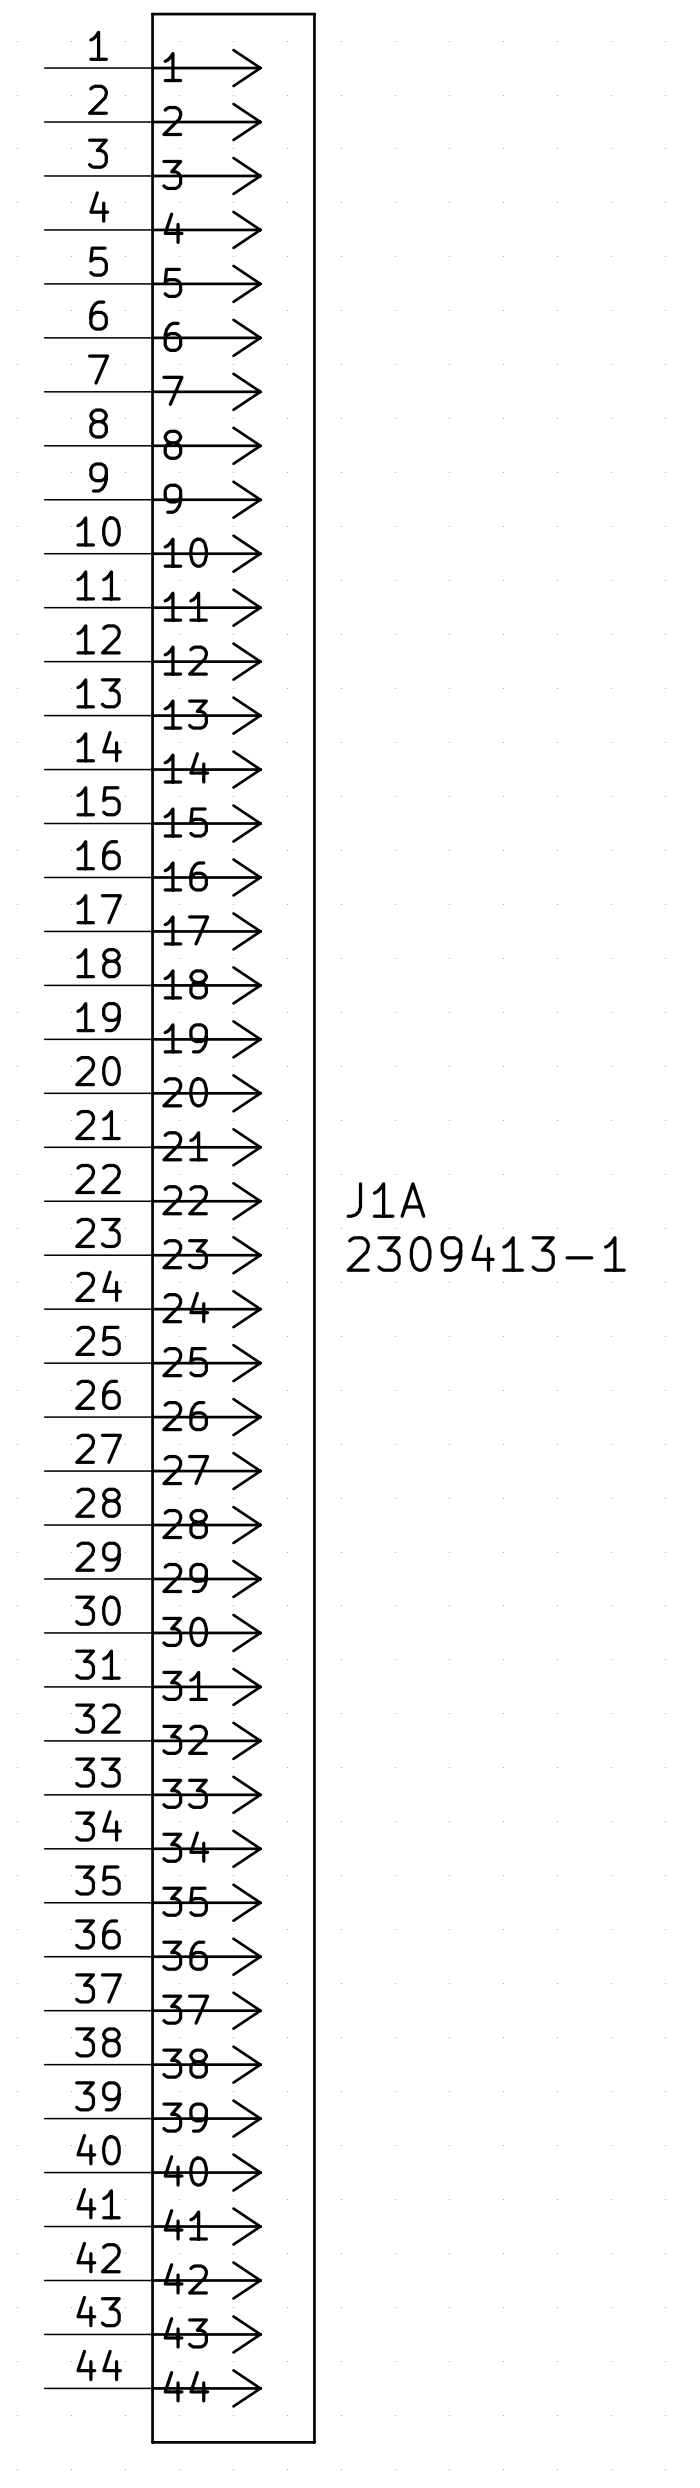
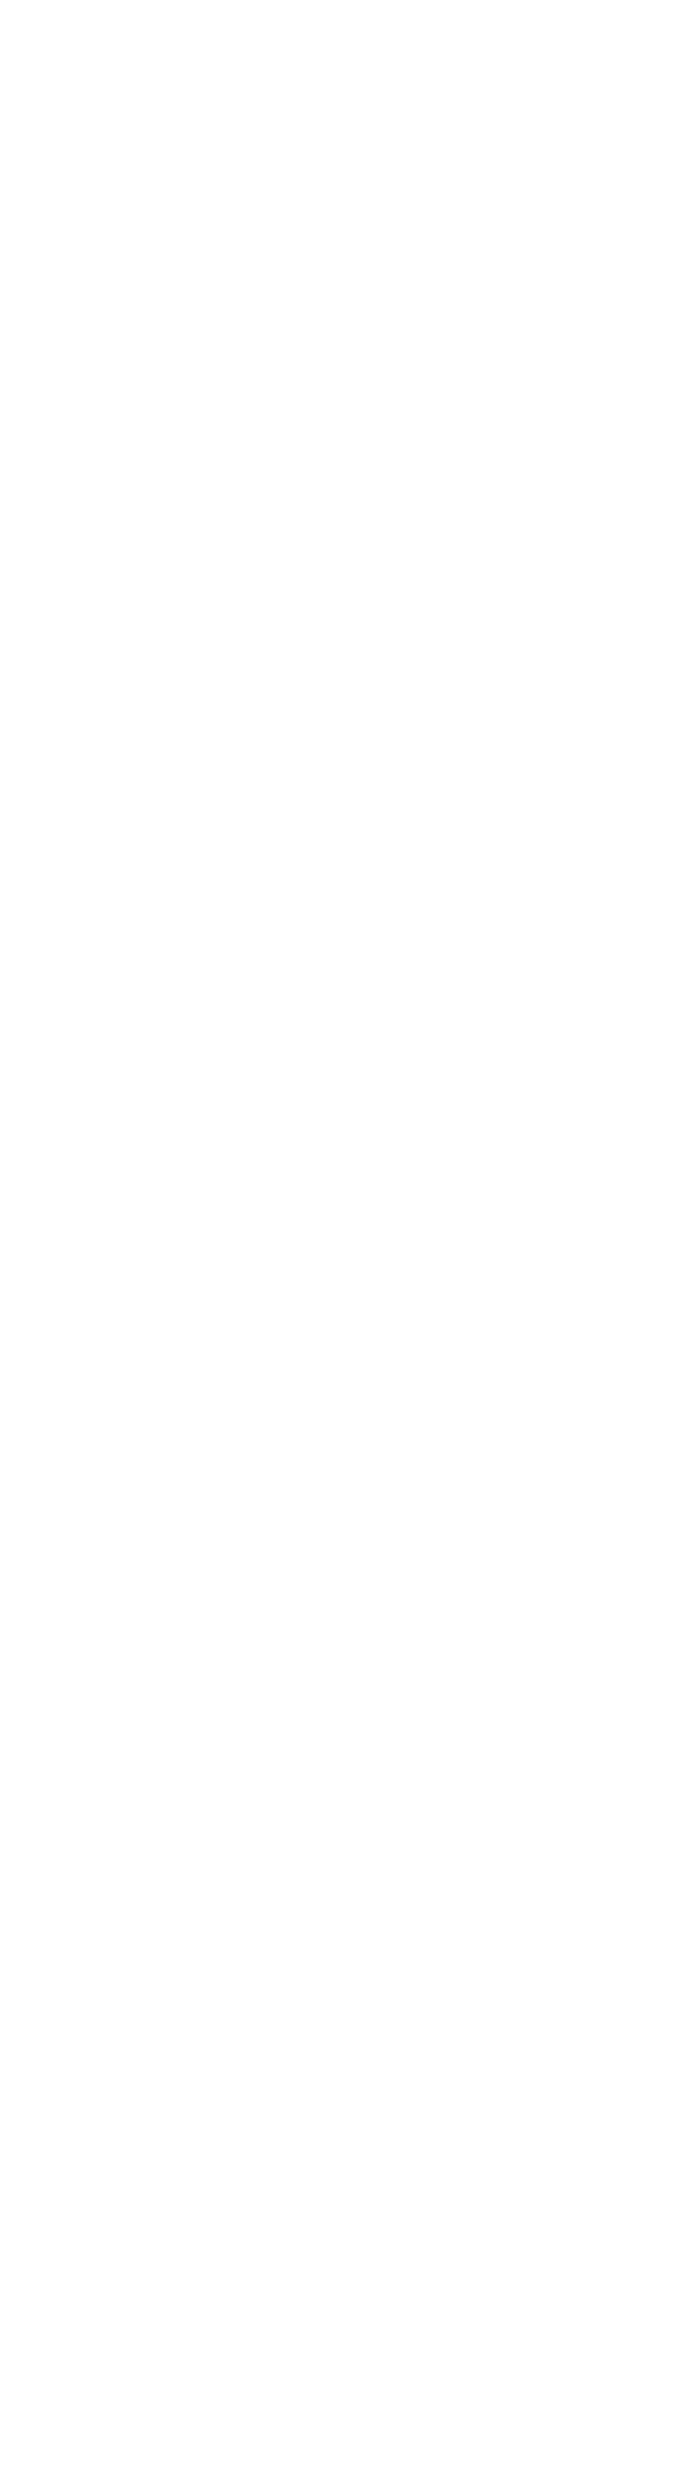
J1A: 2309413-1 (180, 1228) -> none

